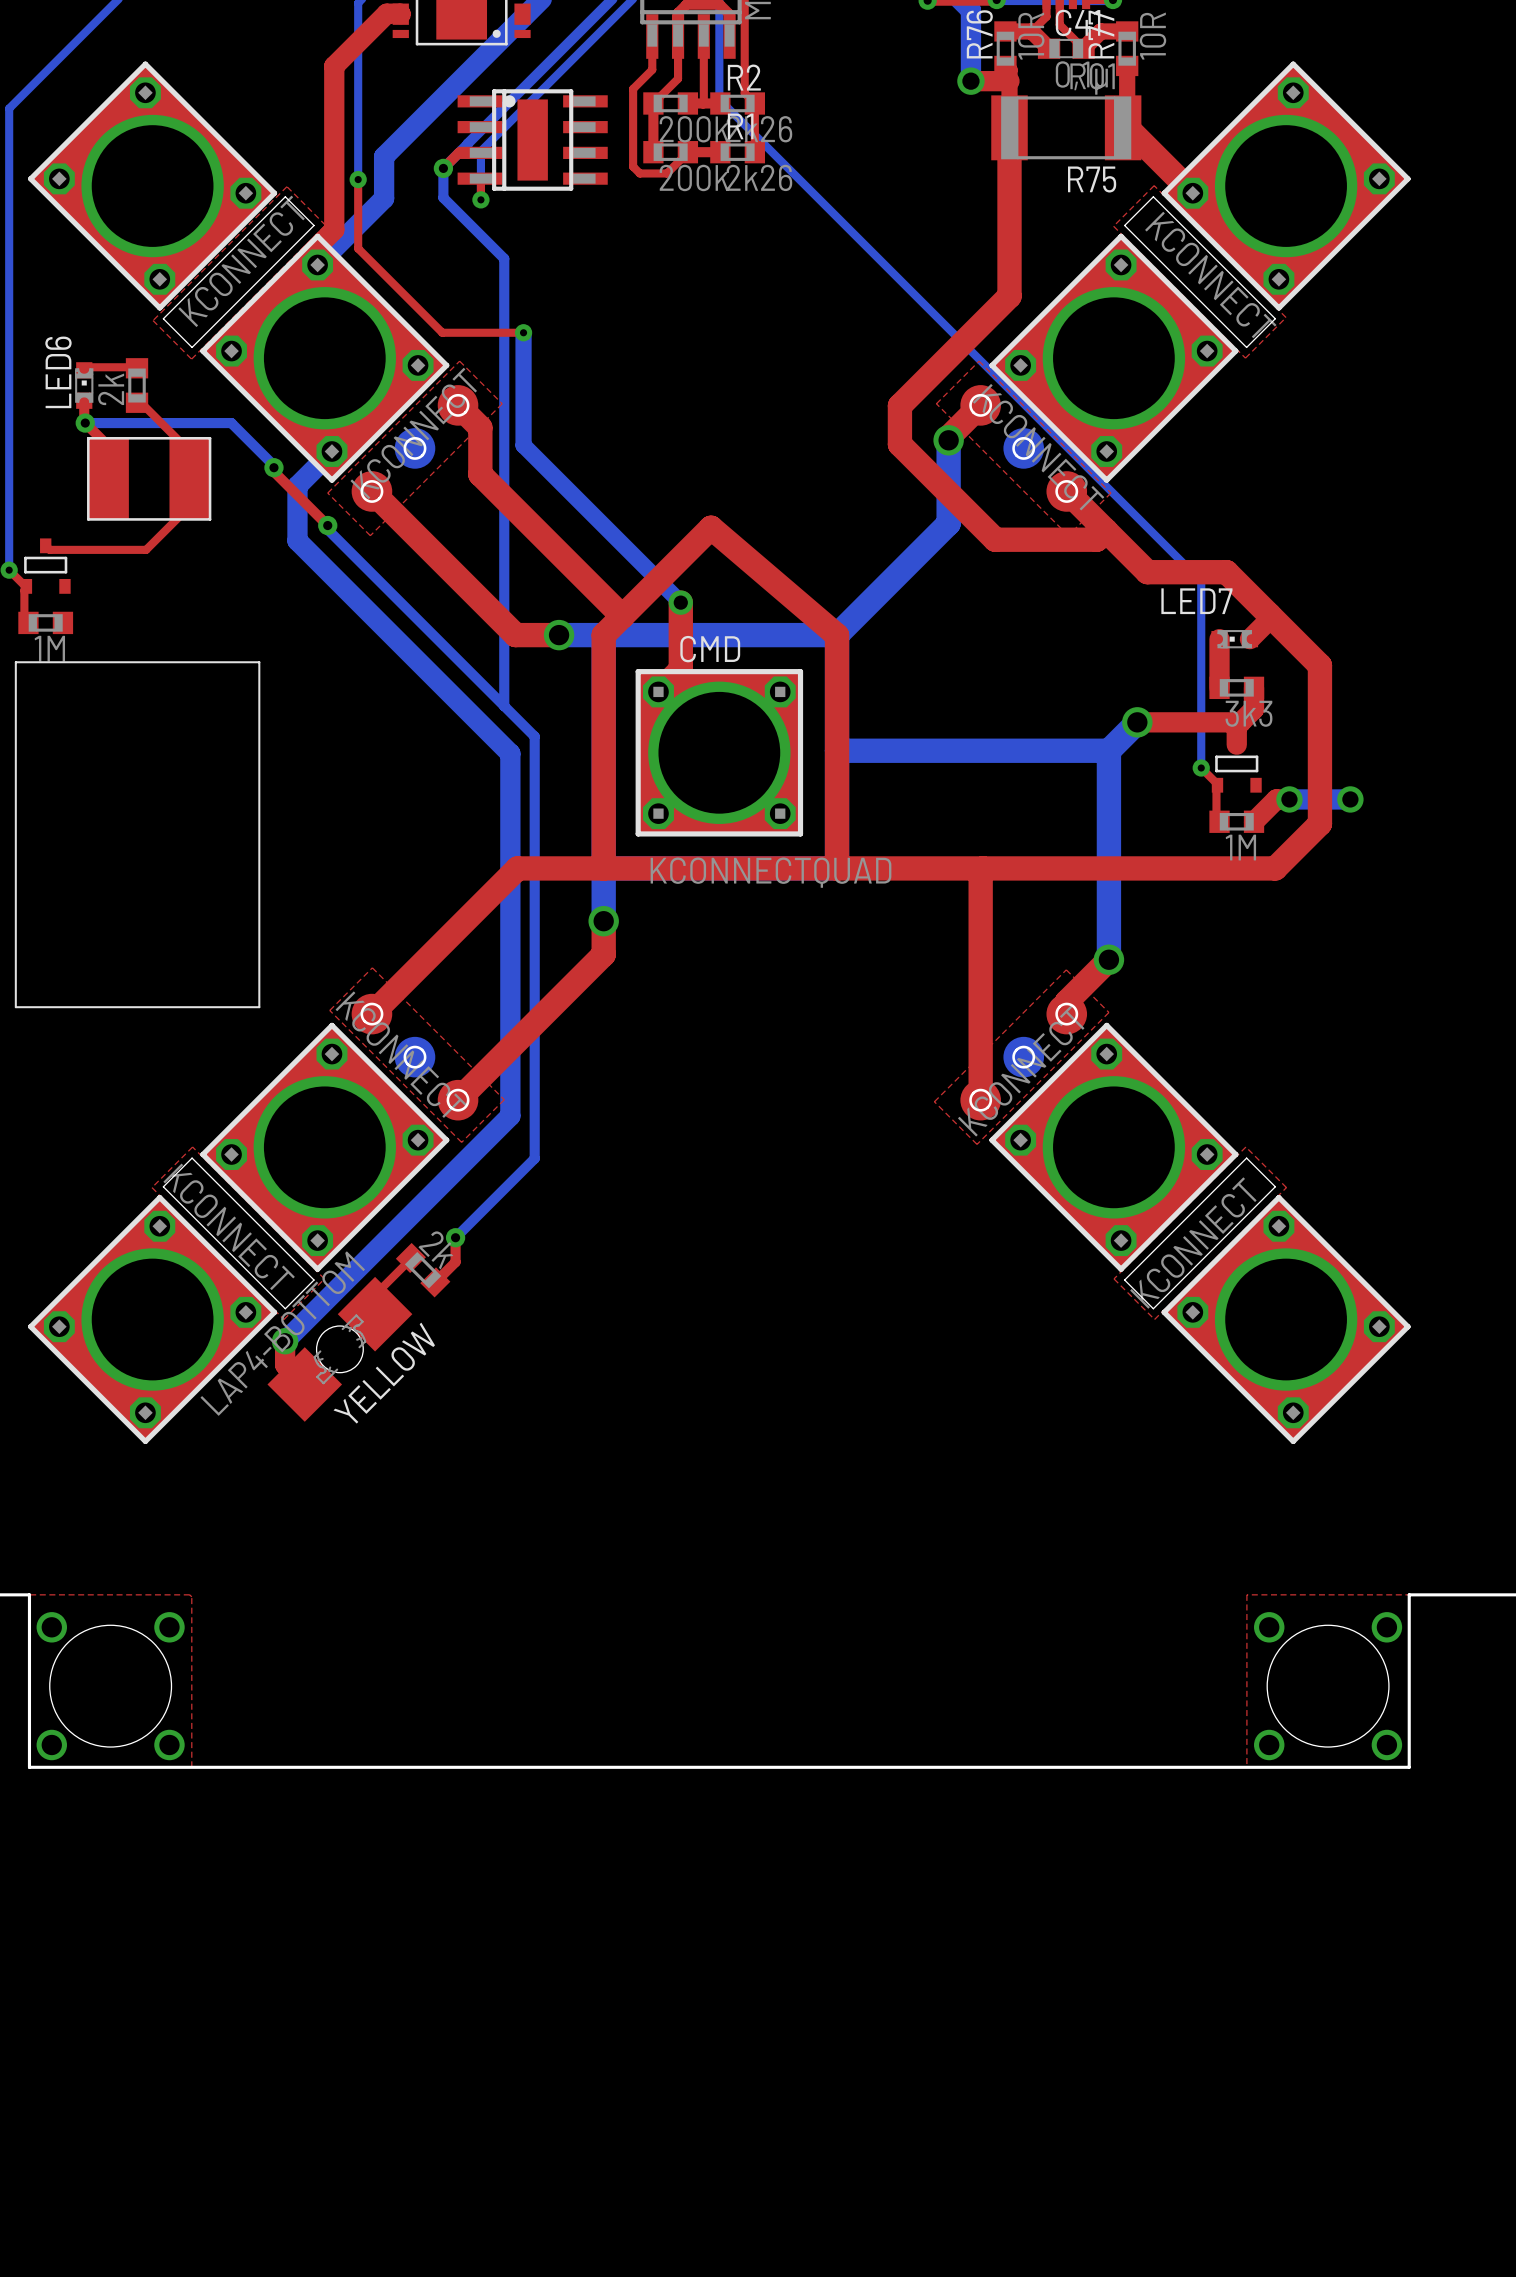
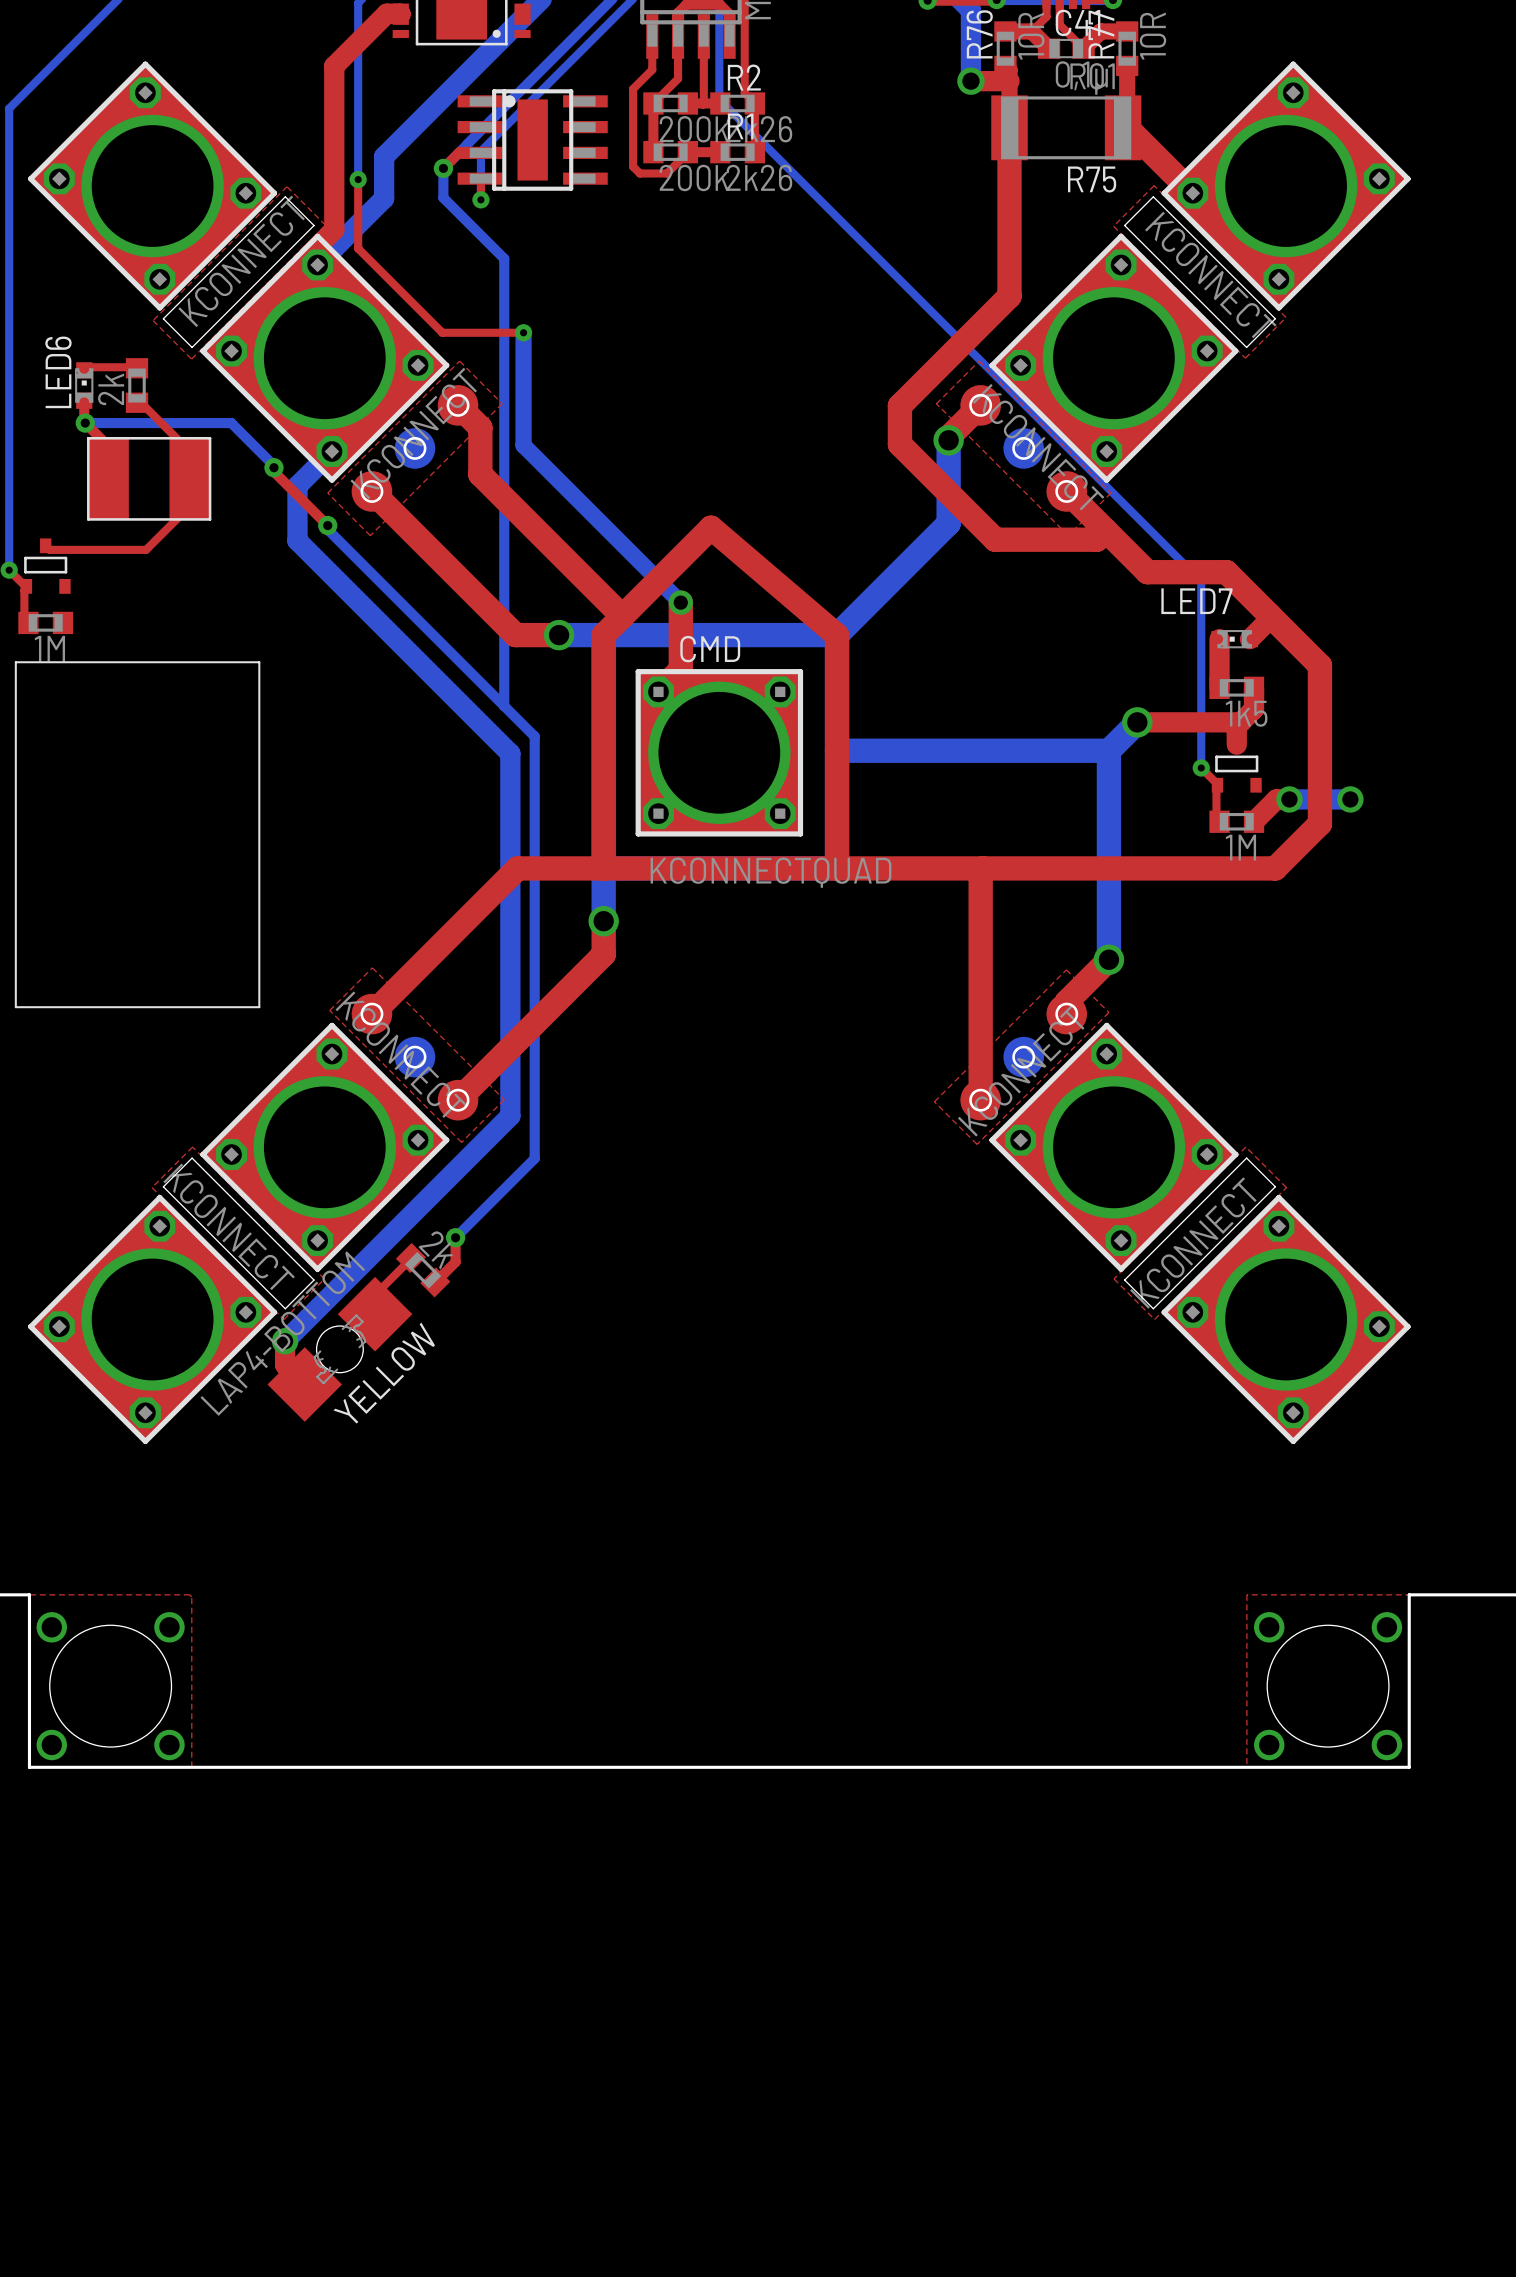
part value: 3k3 (1248, 713) -> 1k5 (1246, 713)

